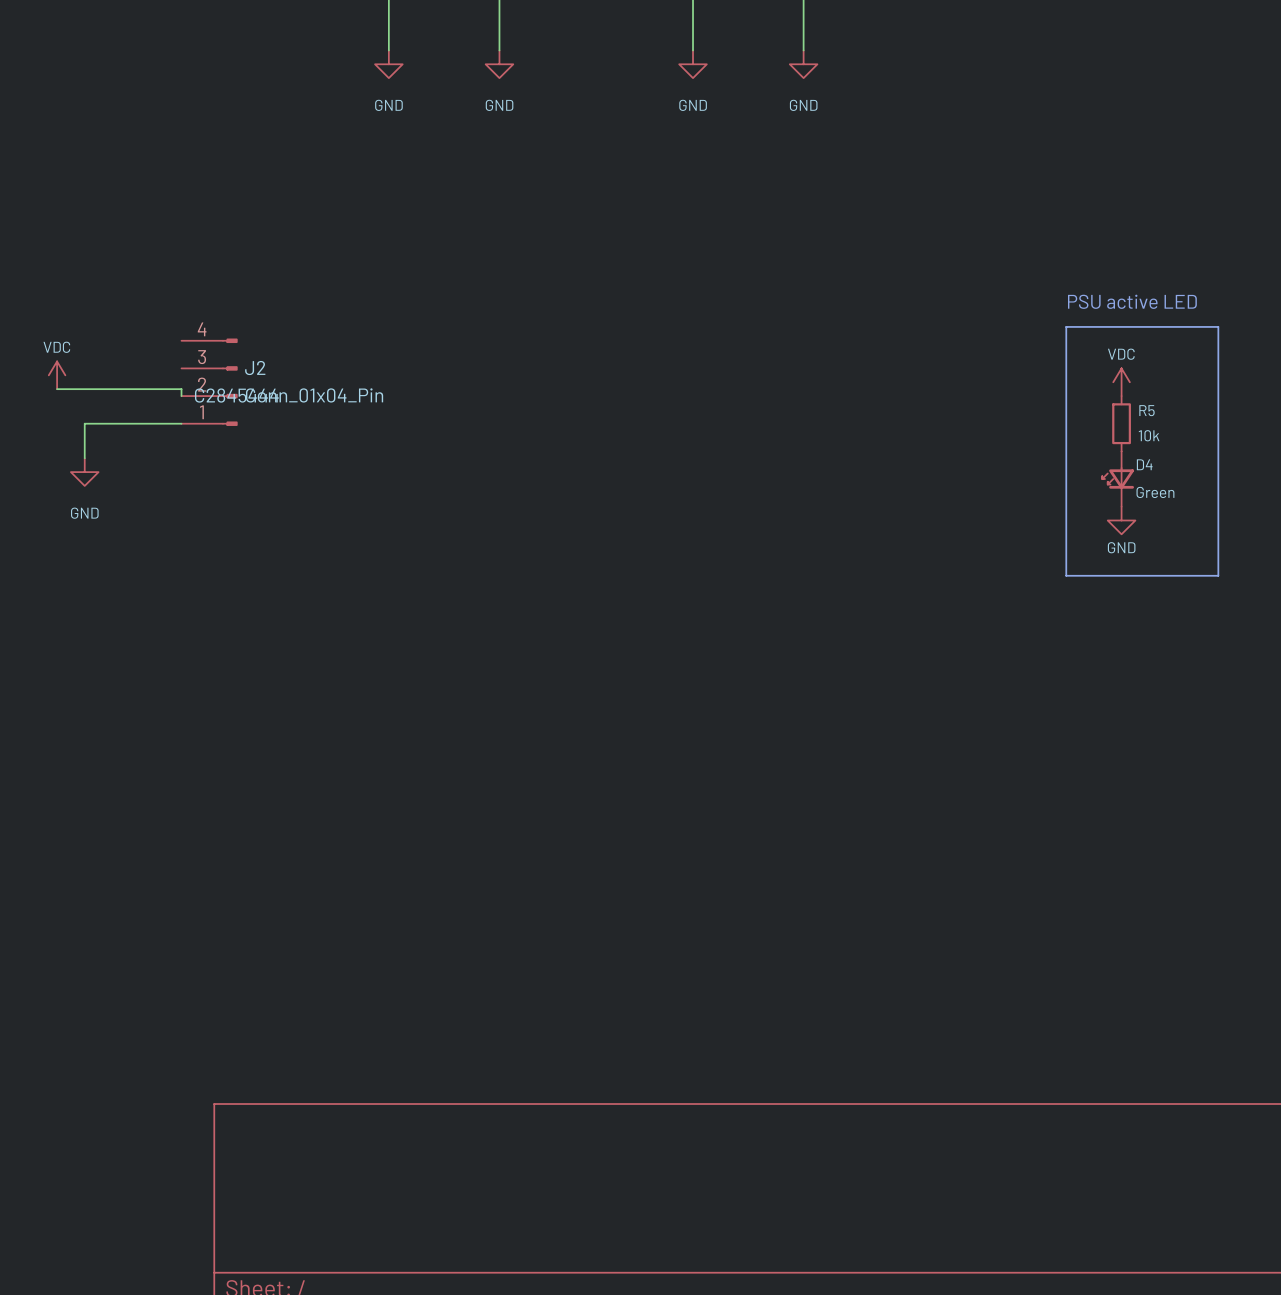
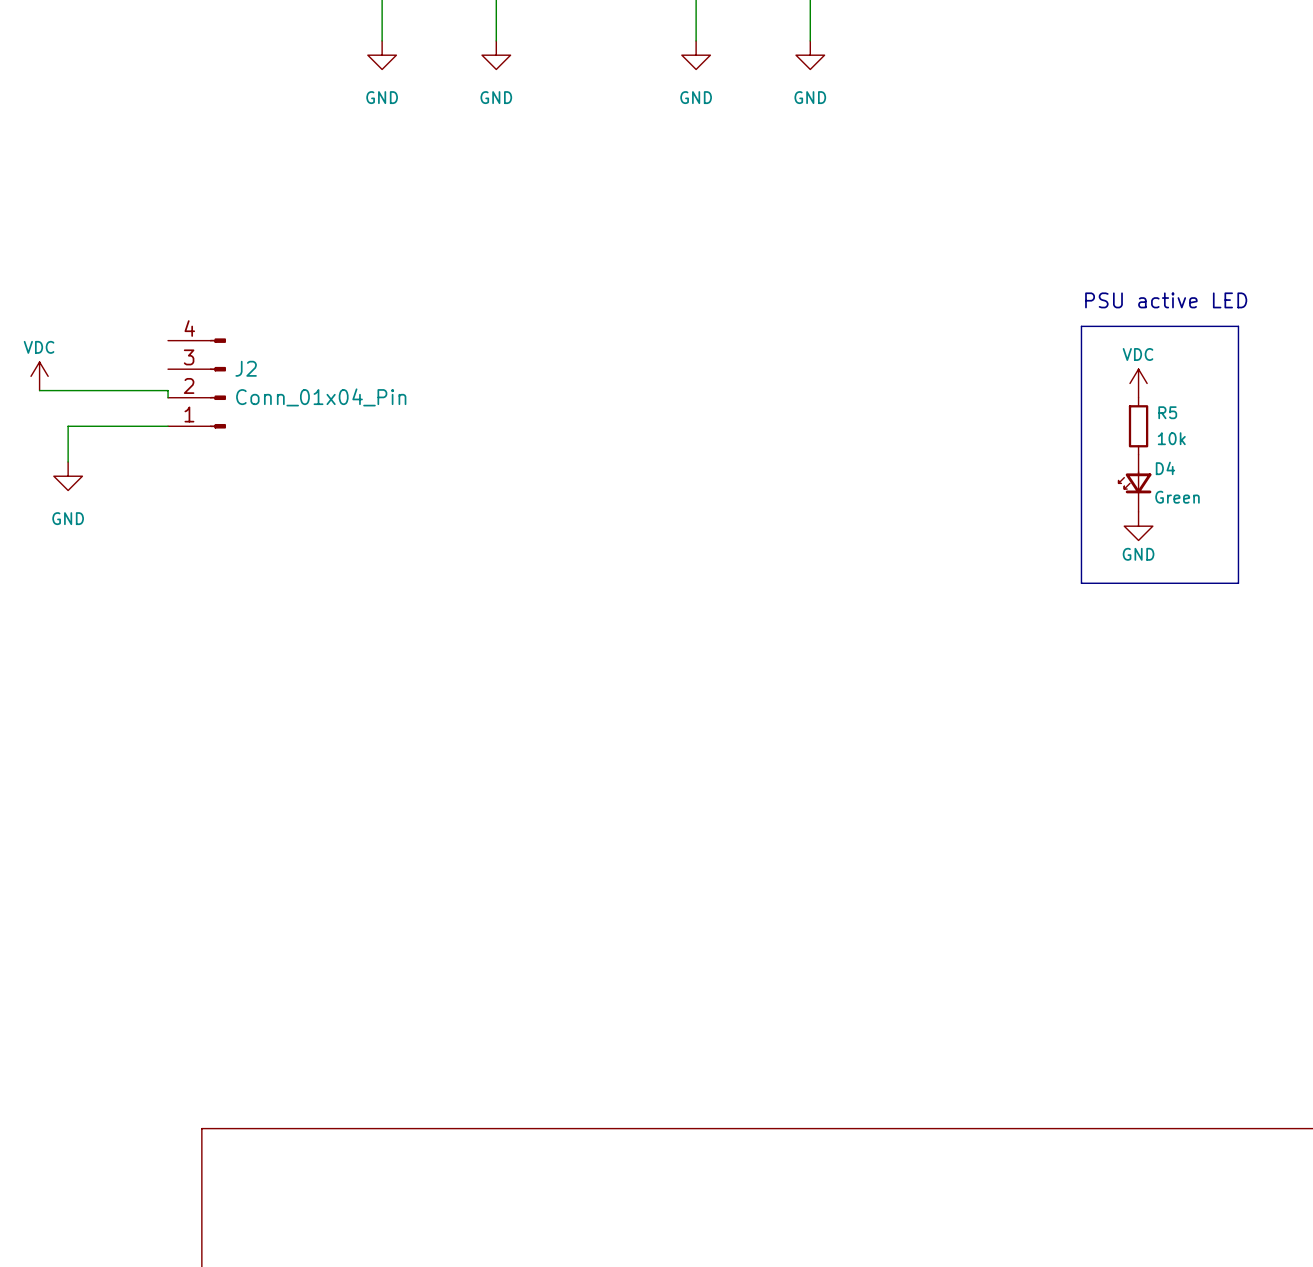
J2 text: C2845444 (236, 395) -> none

